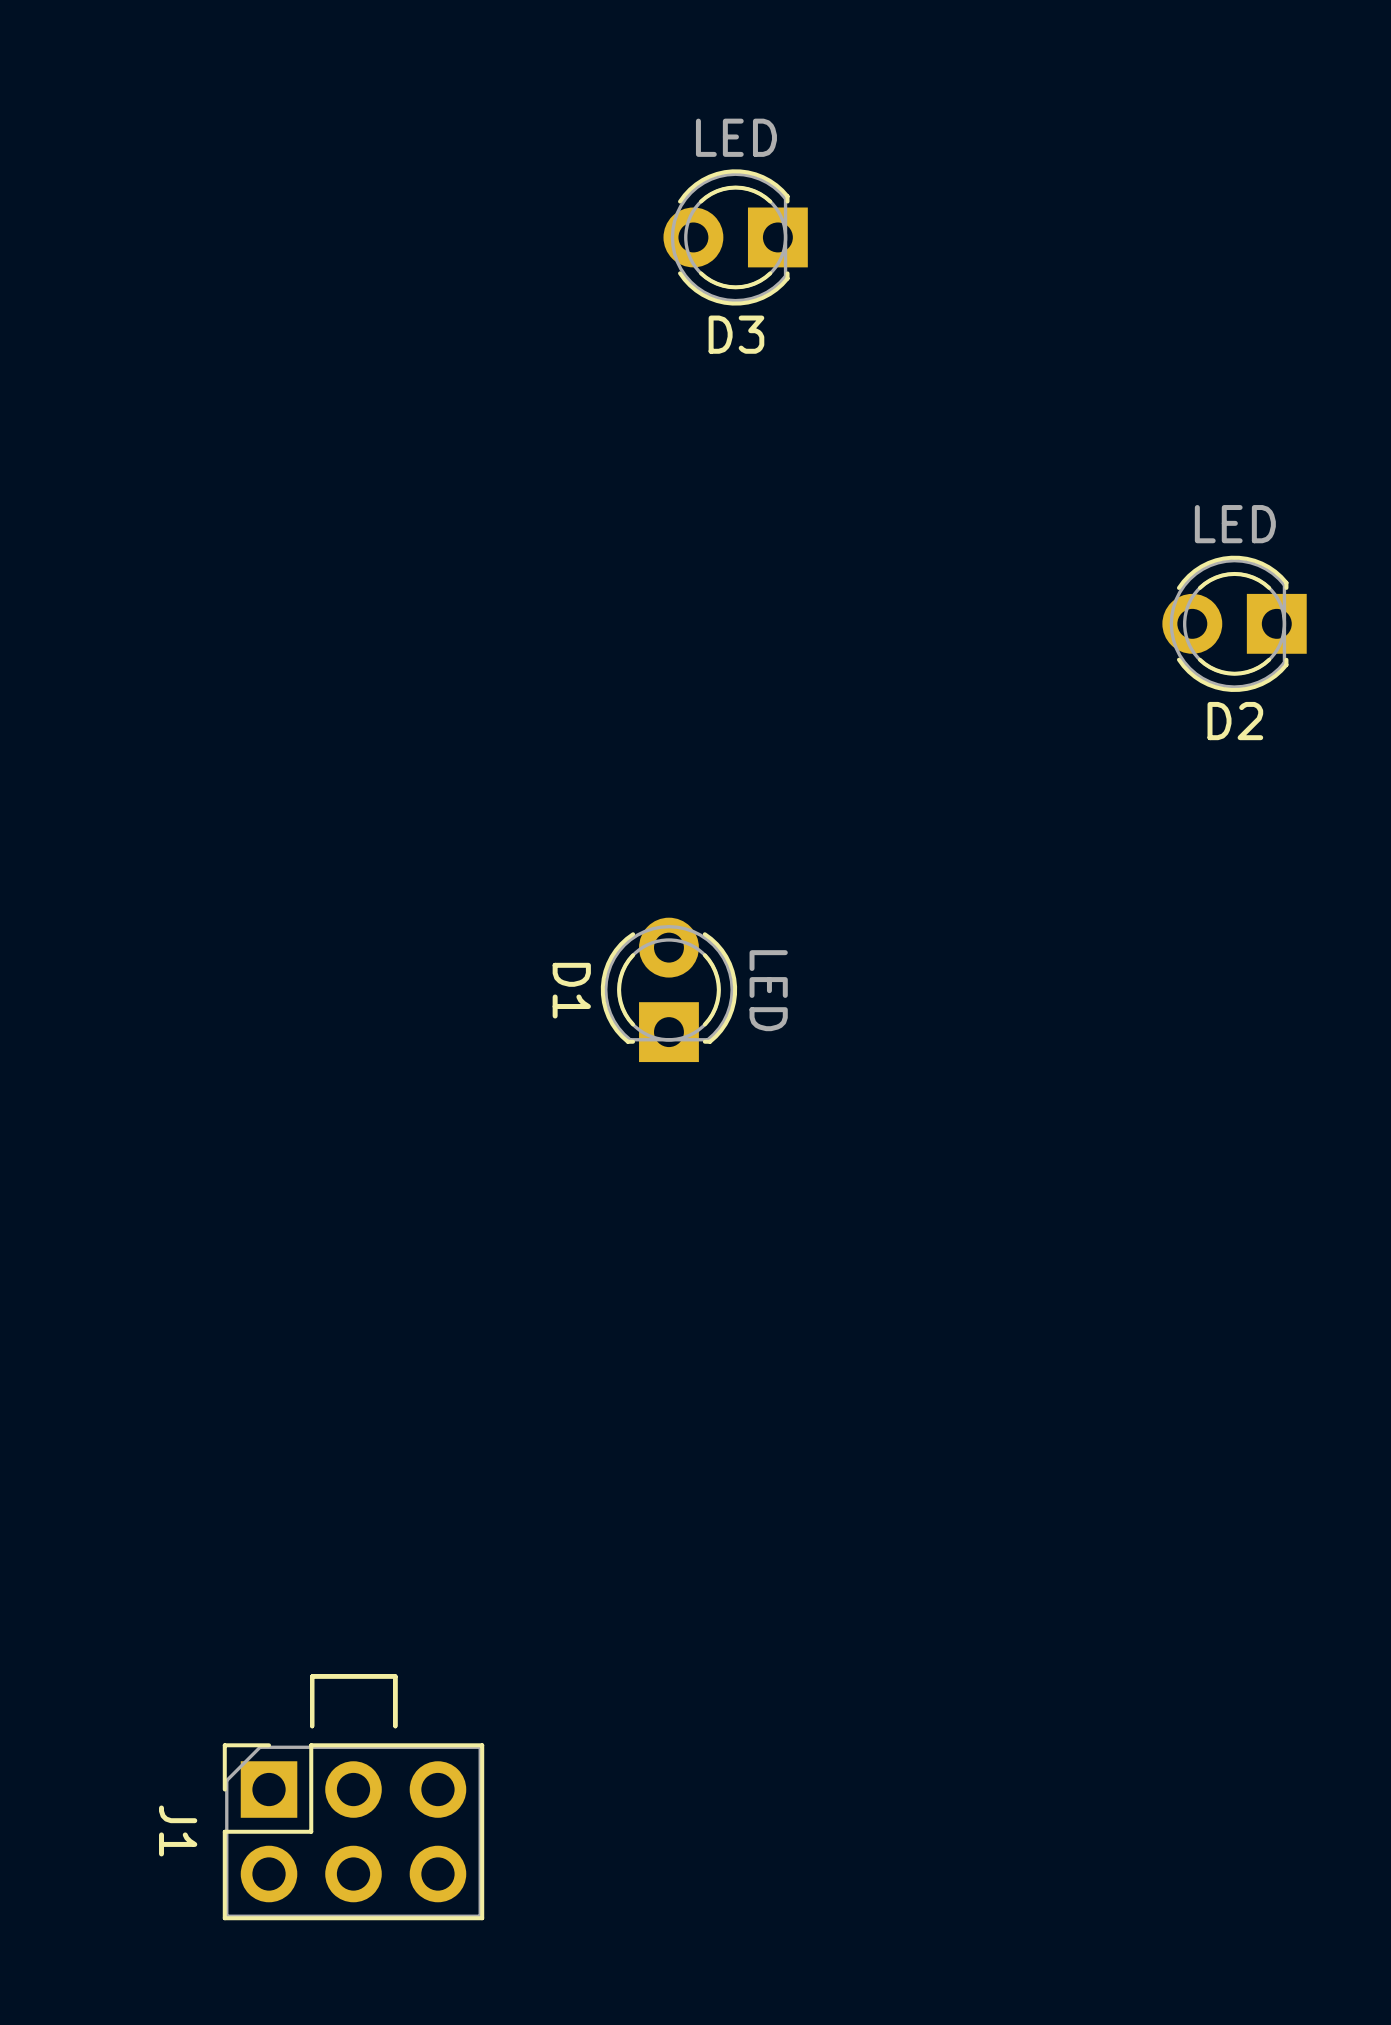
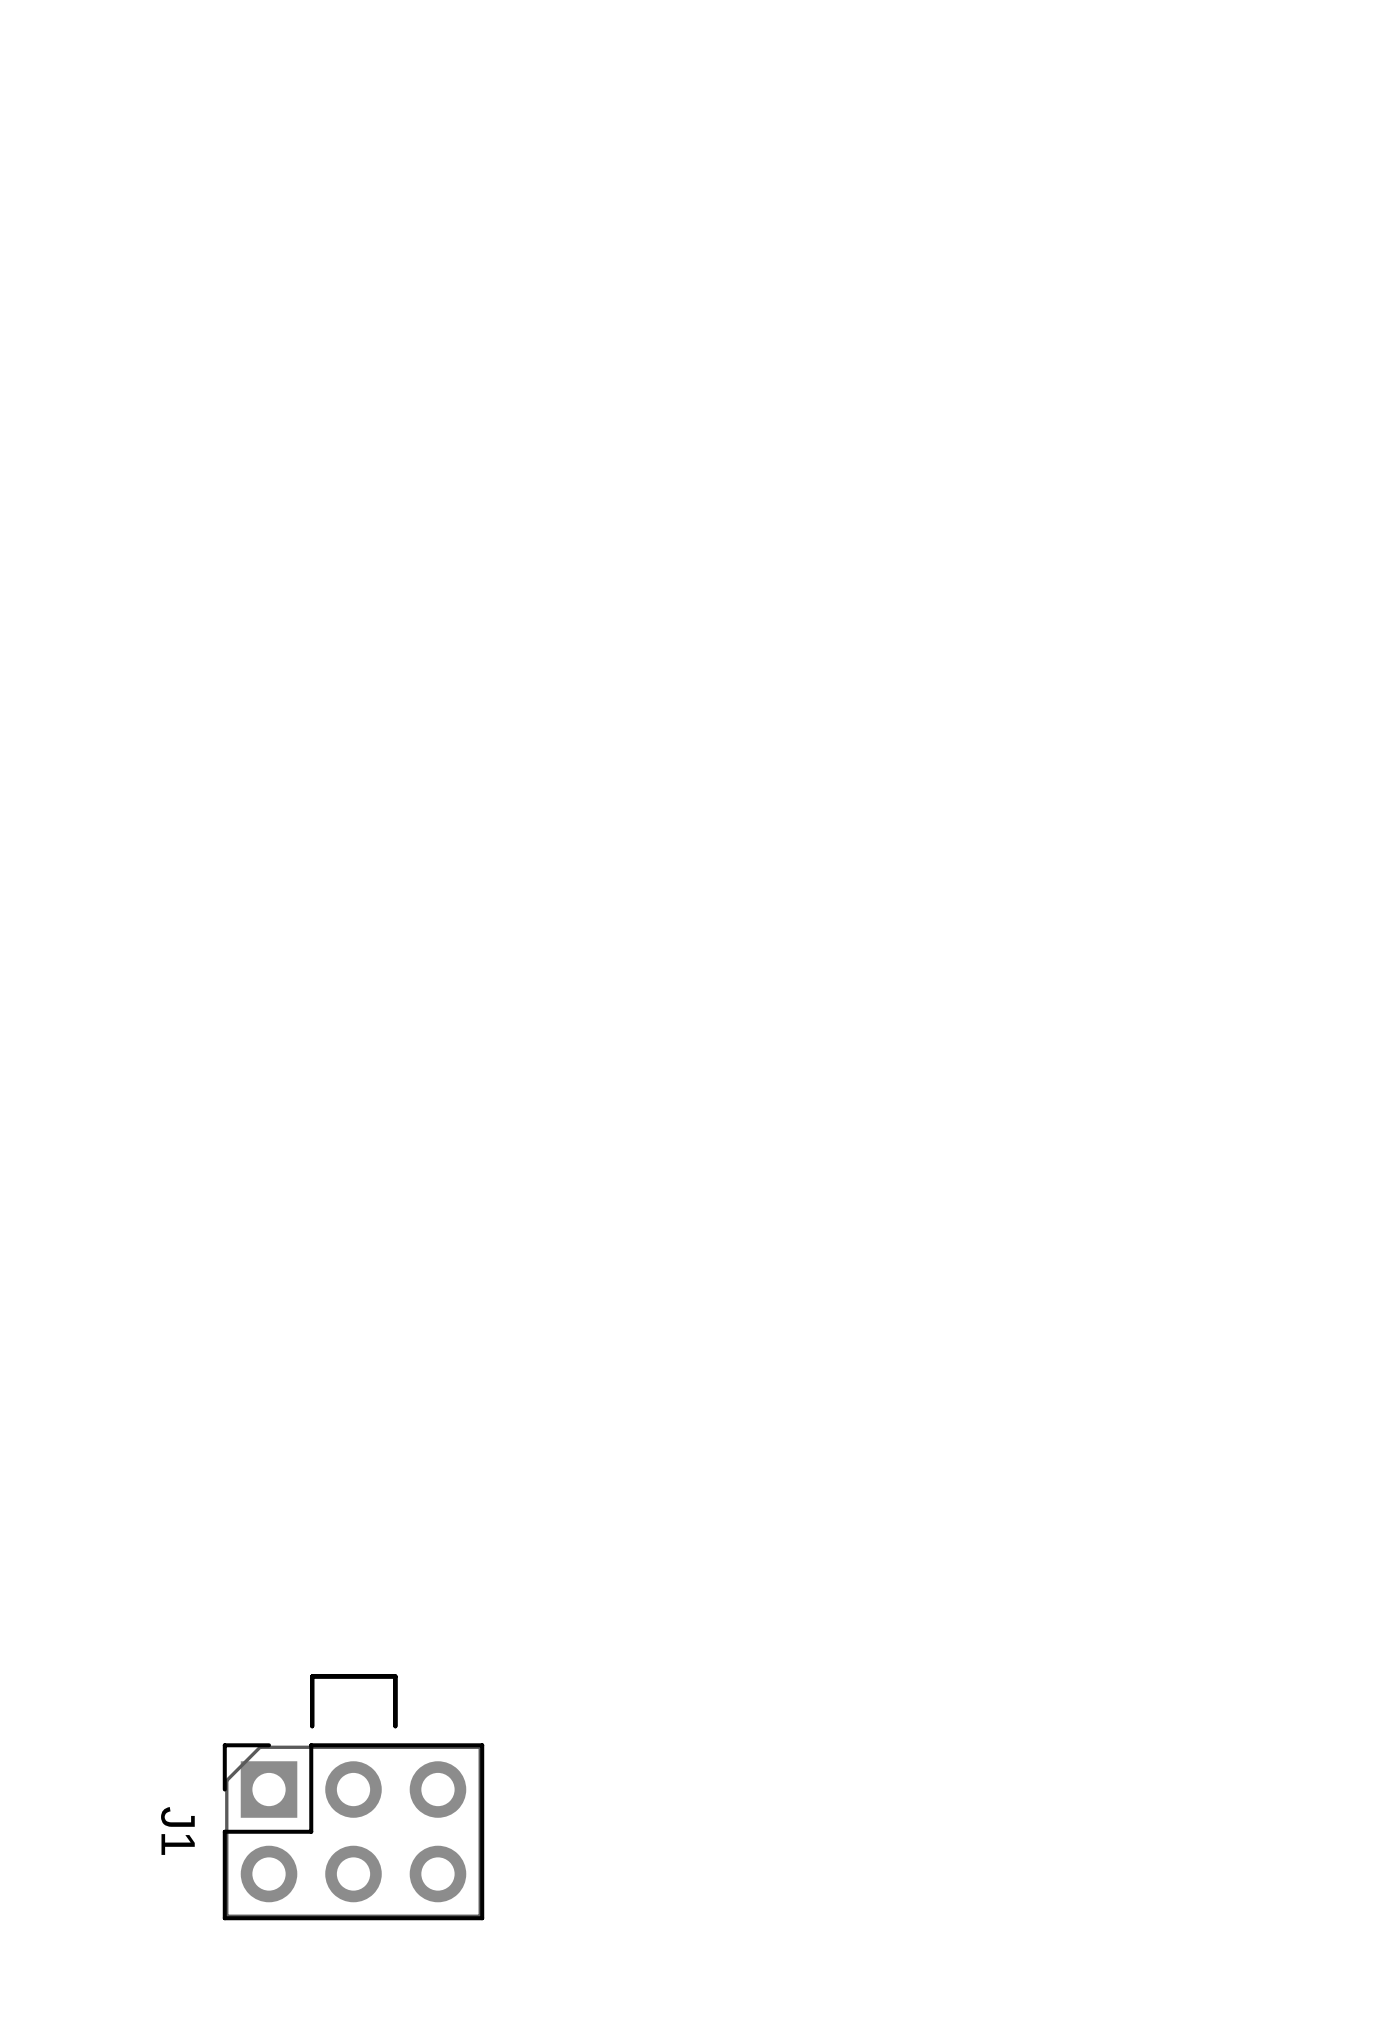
D3: LED (735, 237) -> none
D2: LED (1234, 623) -> none
D1: LED (668, 989) -> none

